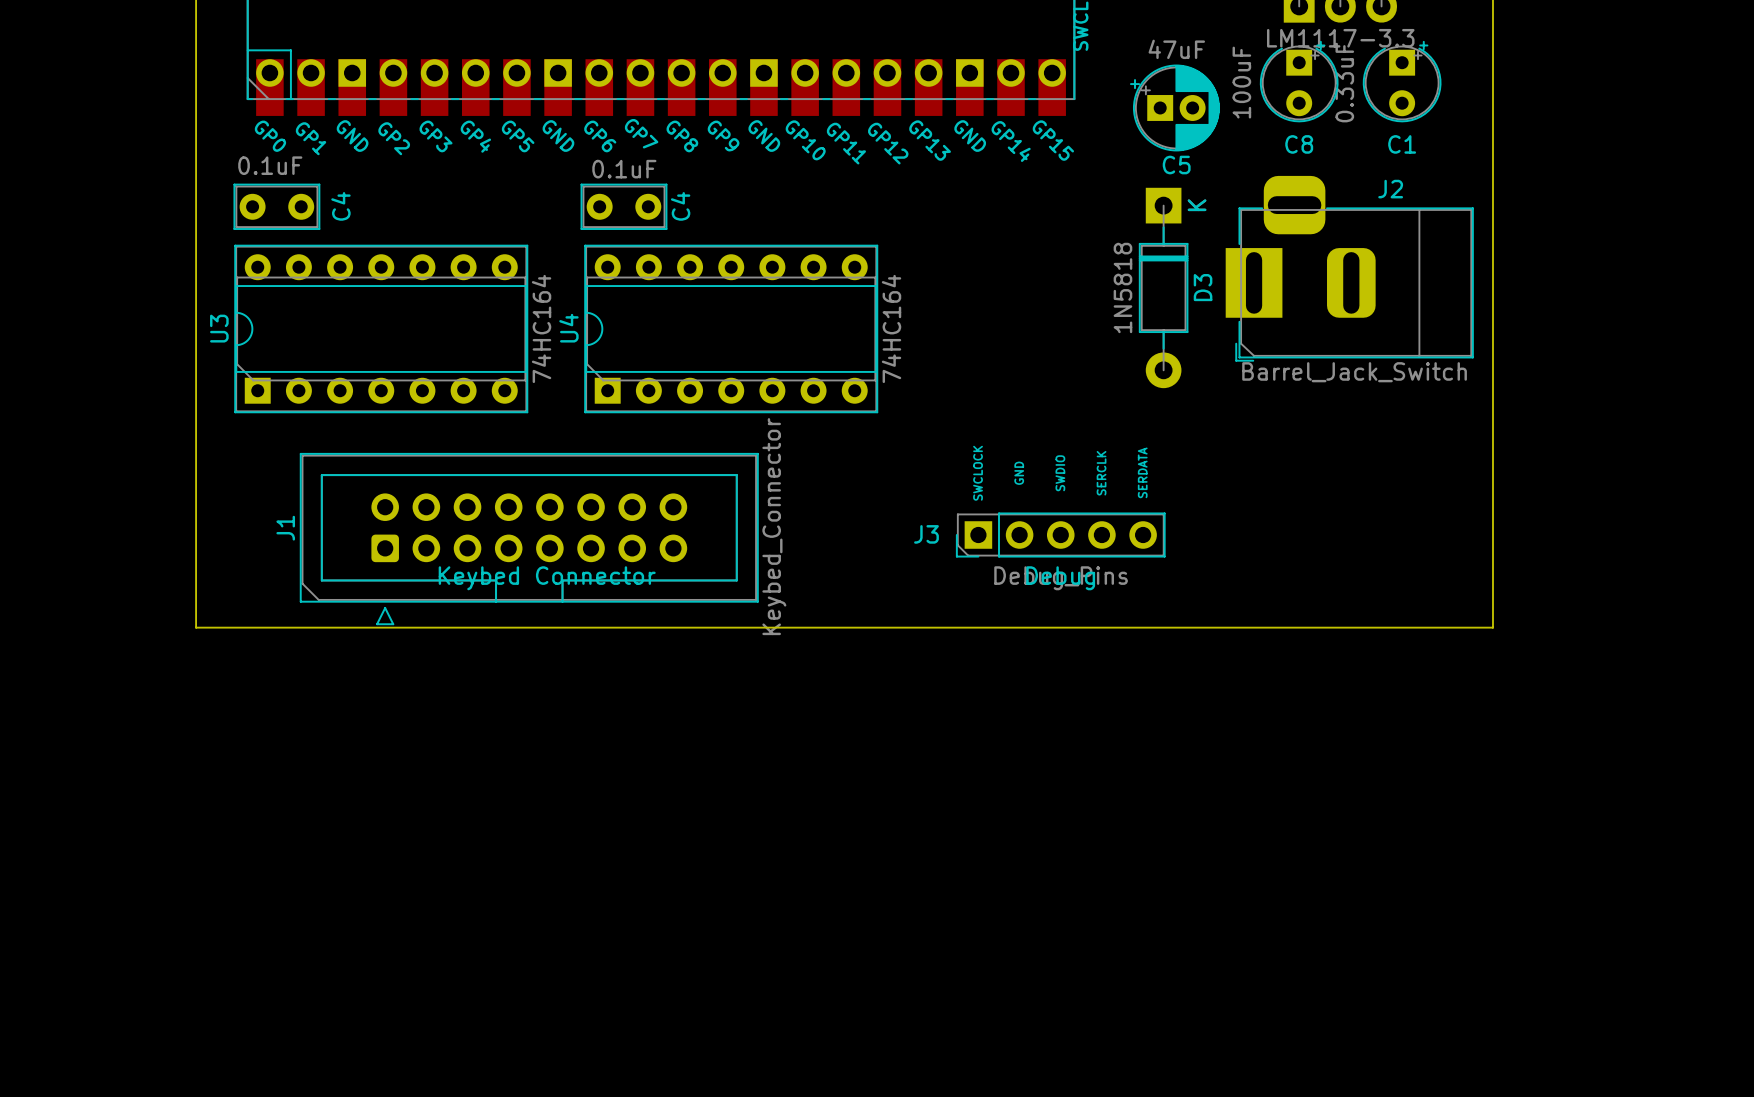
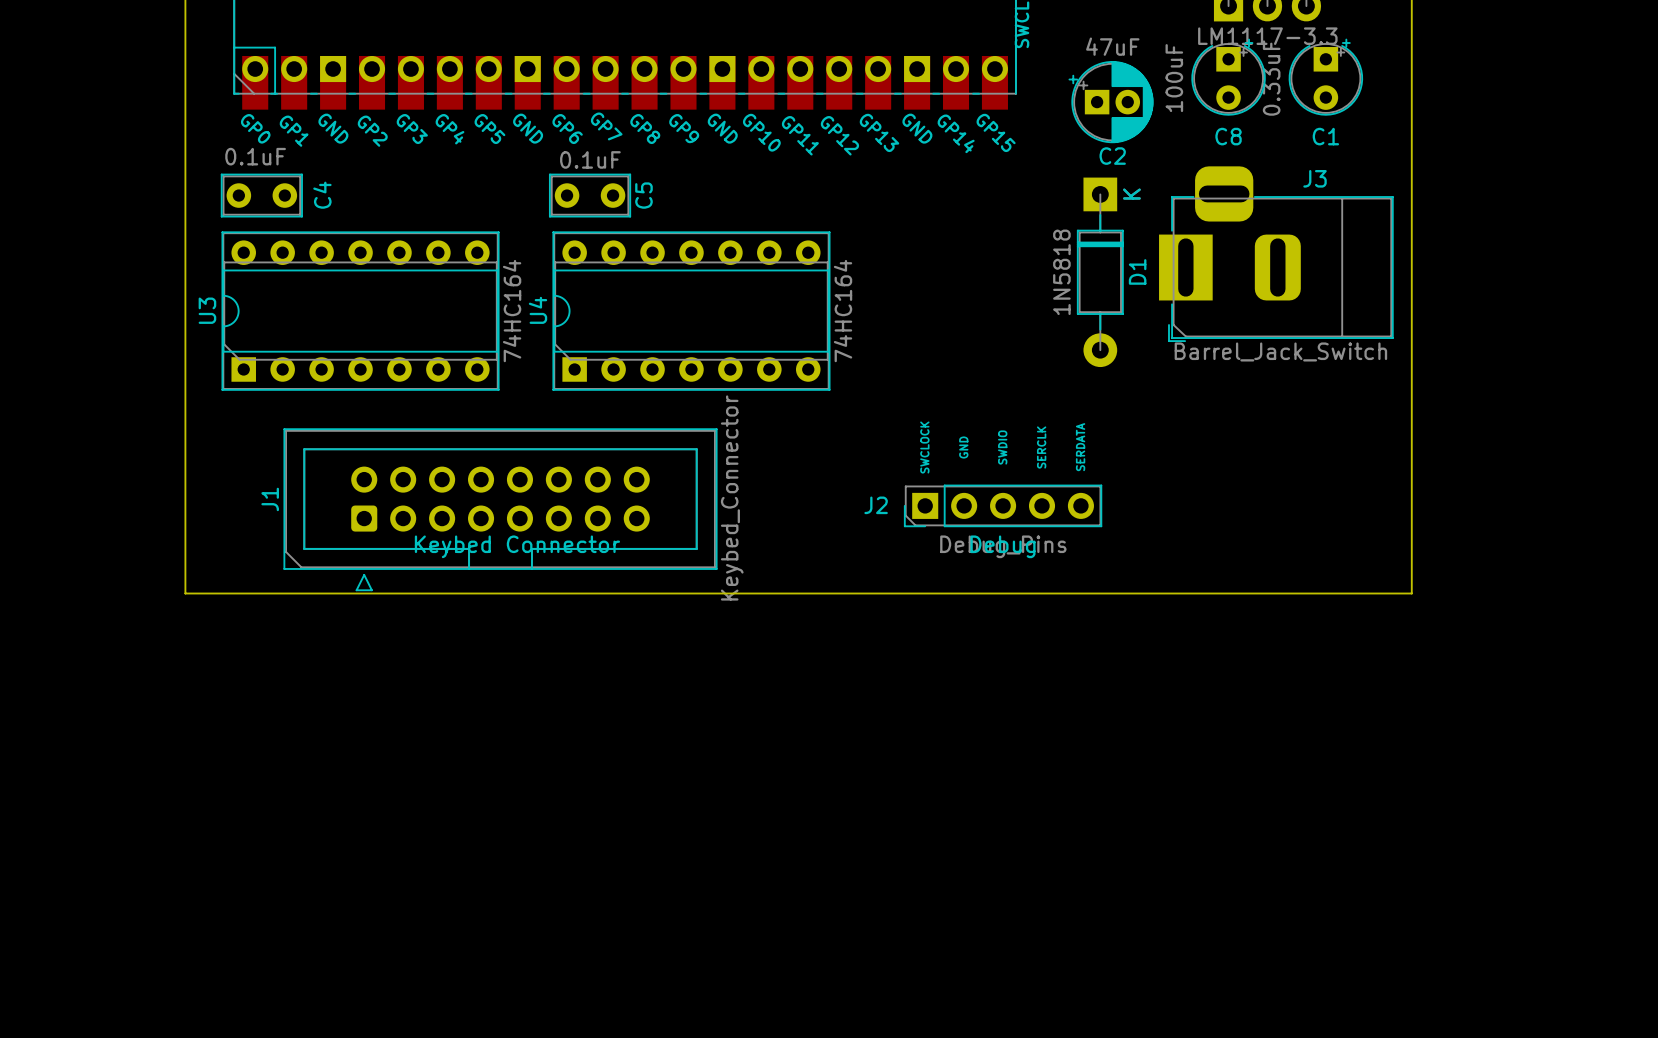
C5 name: C5 (1176, 165) -> C2 (1112, 156)
J2 name: J2 (1390, 189) -> J3 (1315, 178)
C4 name: C4 (680, 206) -> C5 (643, 195)
D3 name: D3 (1203, 287) -> D1 (1137, 271)
J3 name: J3 (926, 534) -> J2 (876, 505)

